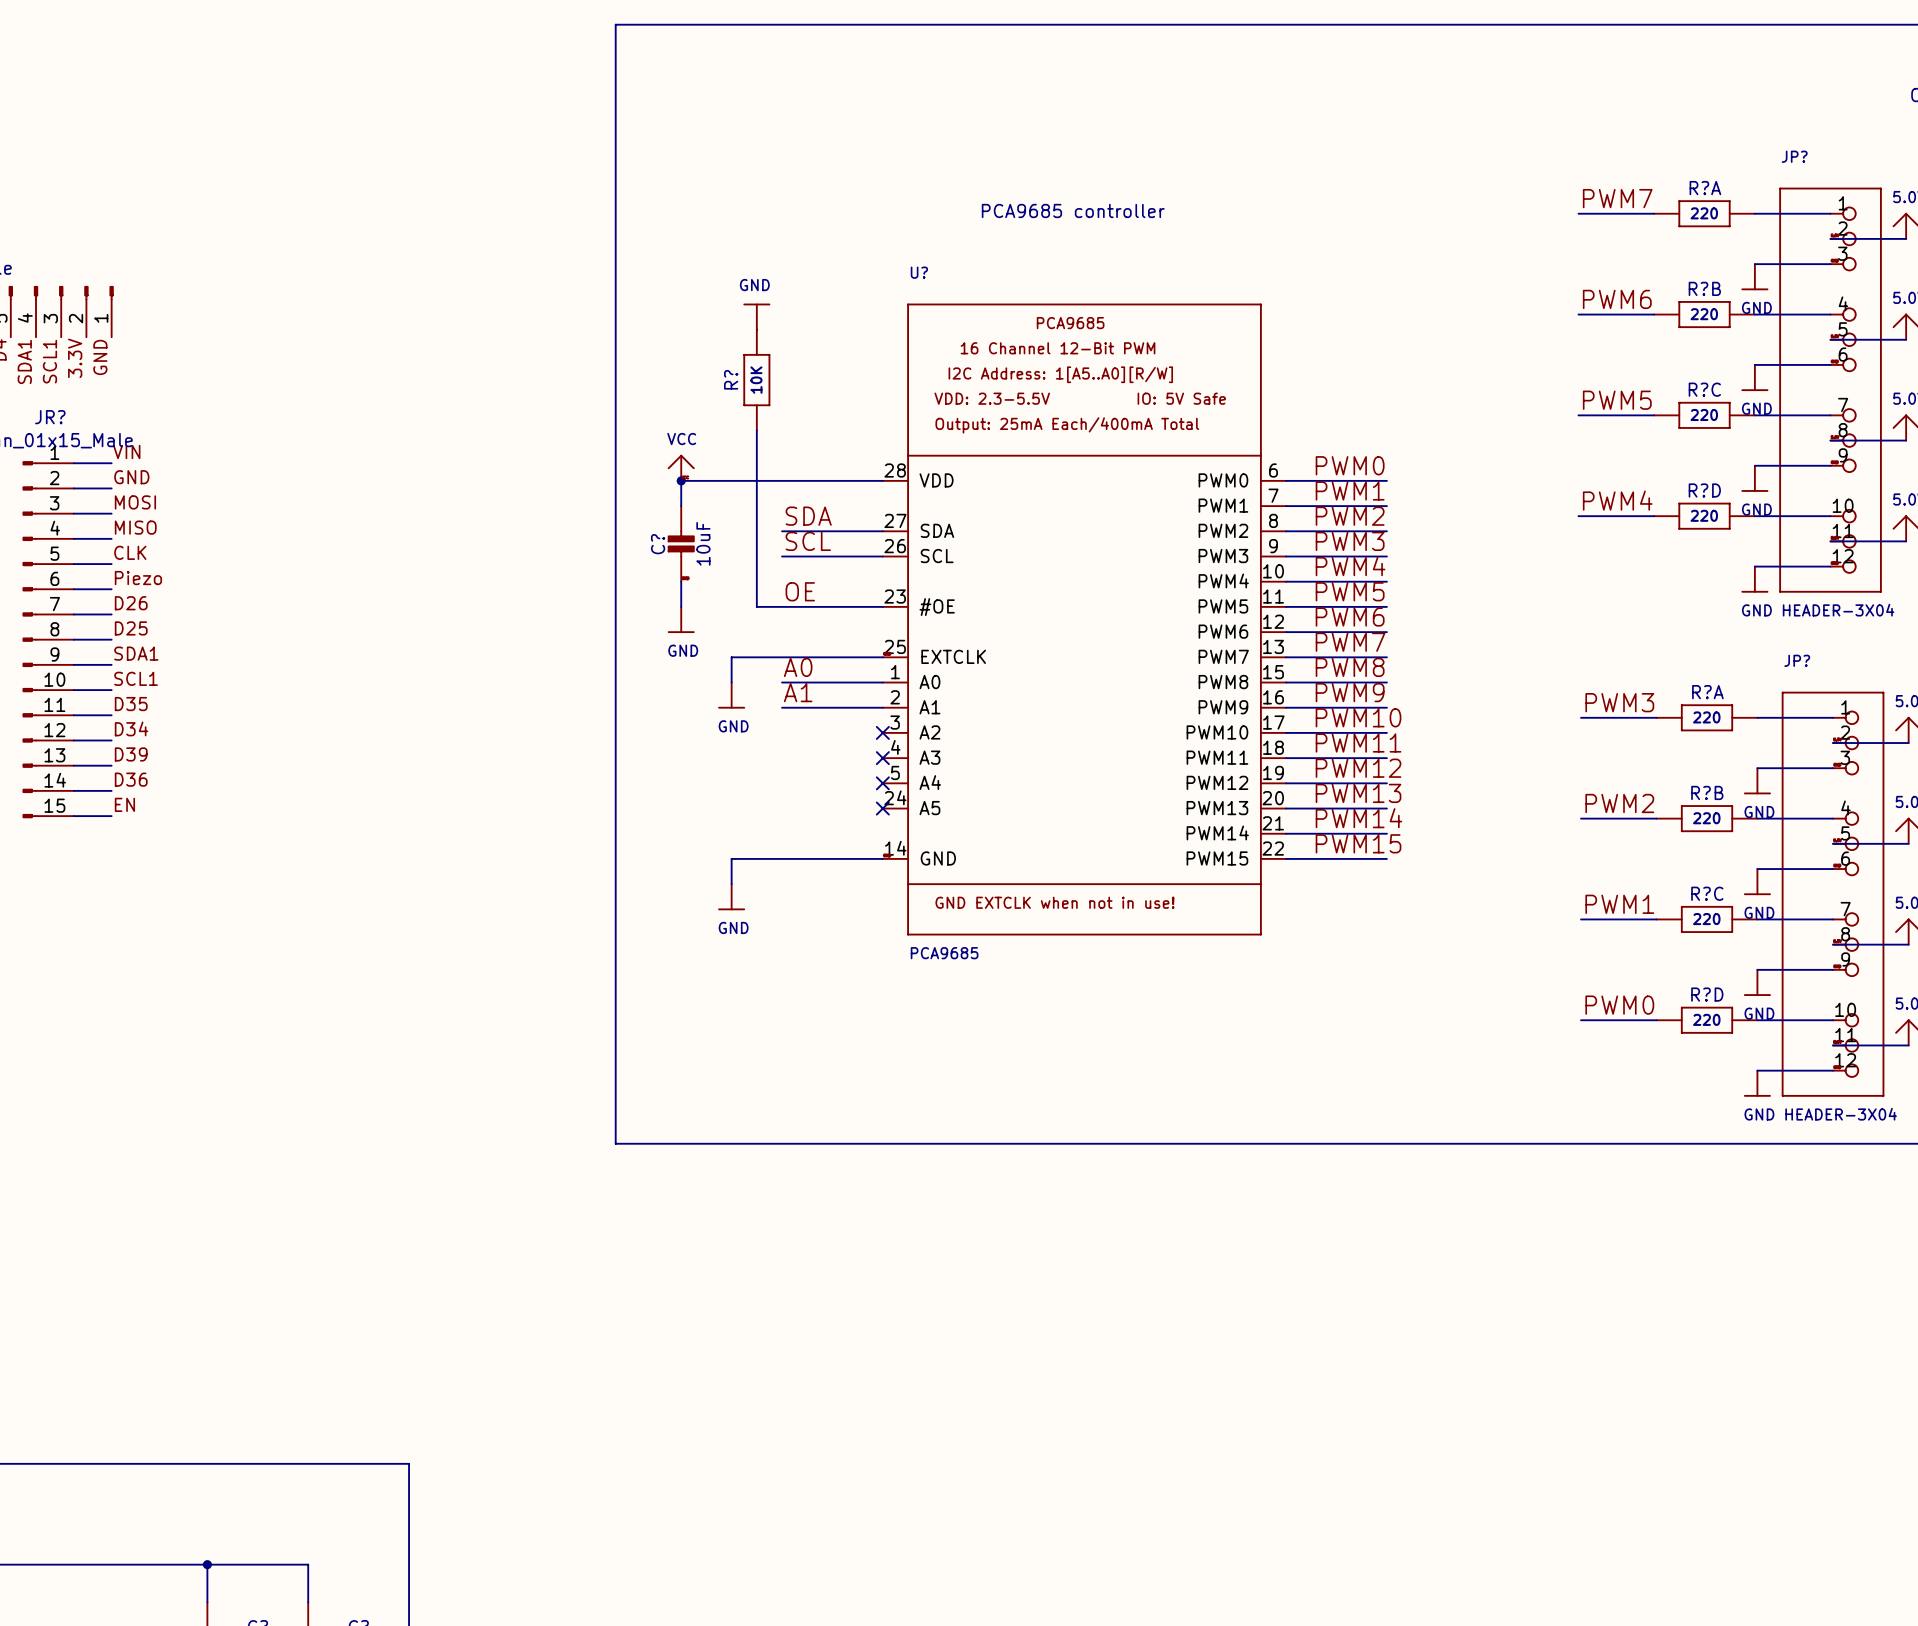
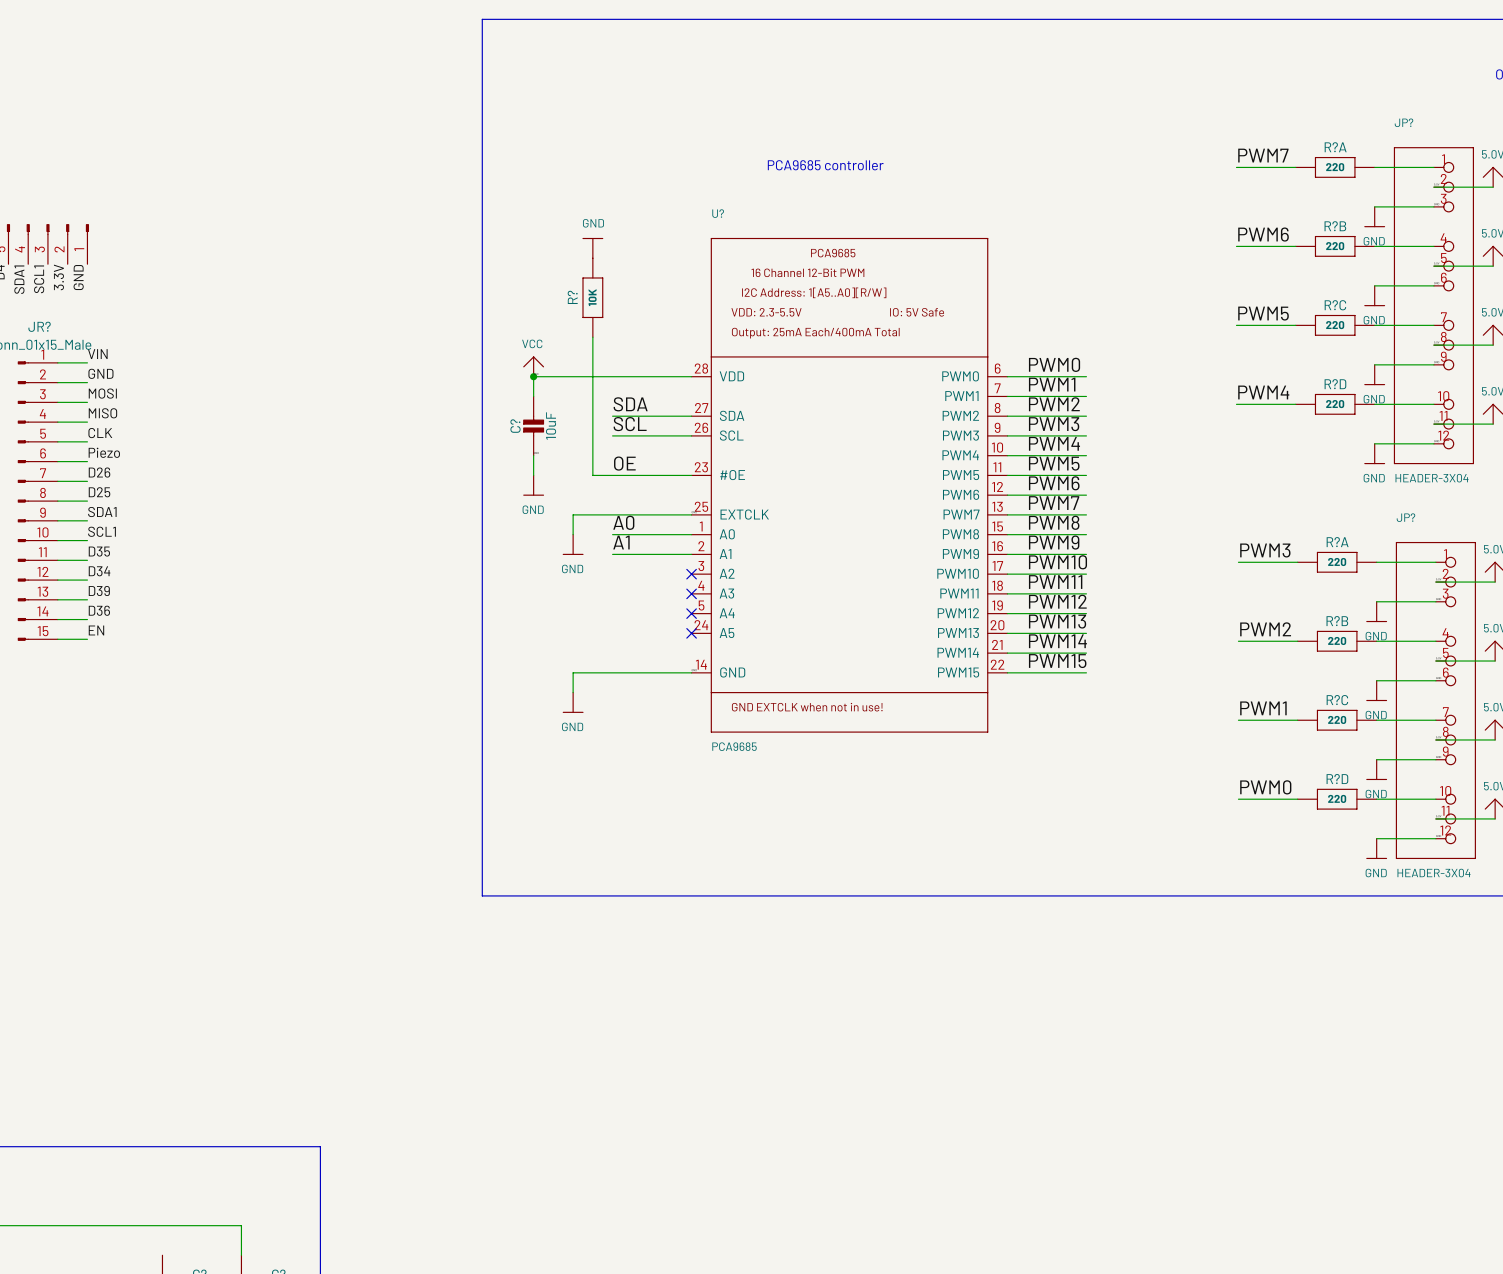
wire: (207, 1564) (207, 1602) -> none
junction: (207, 1564) -> none

